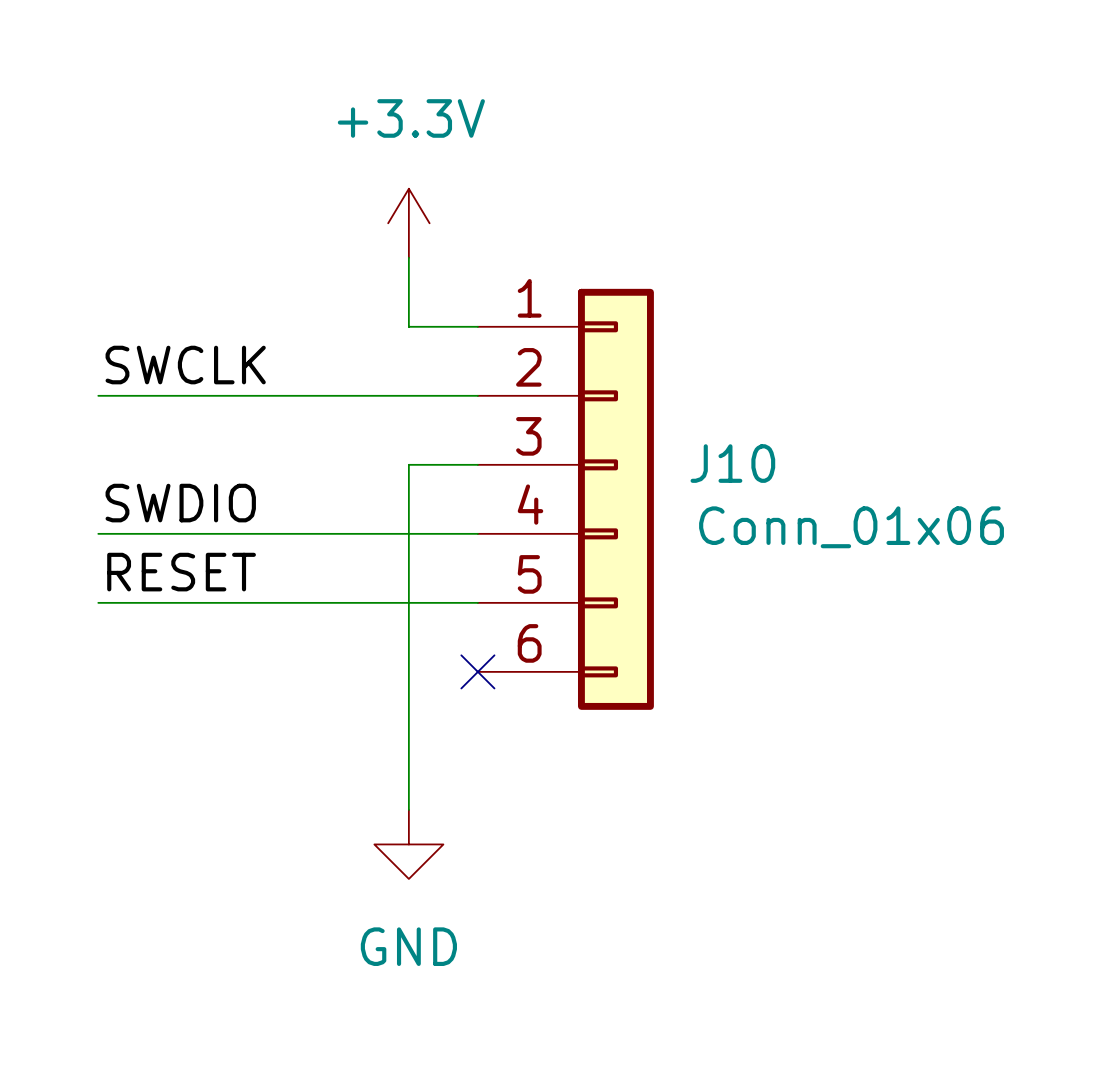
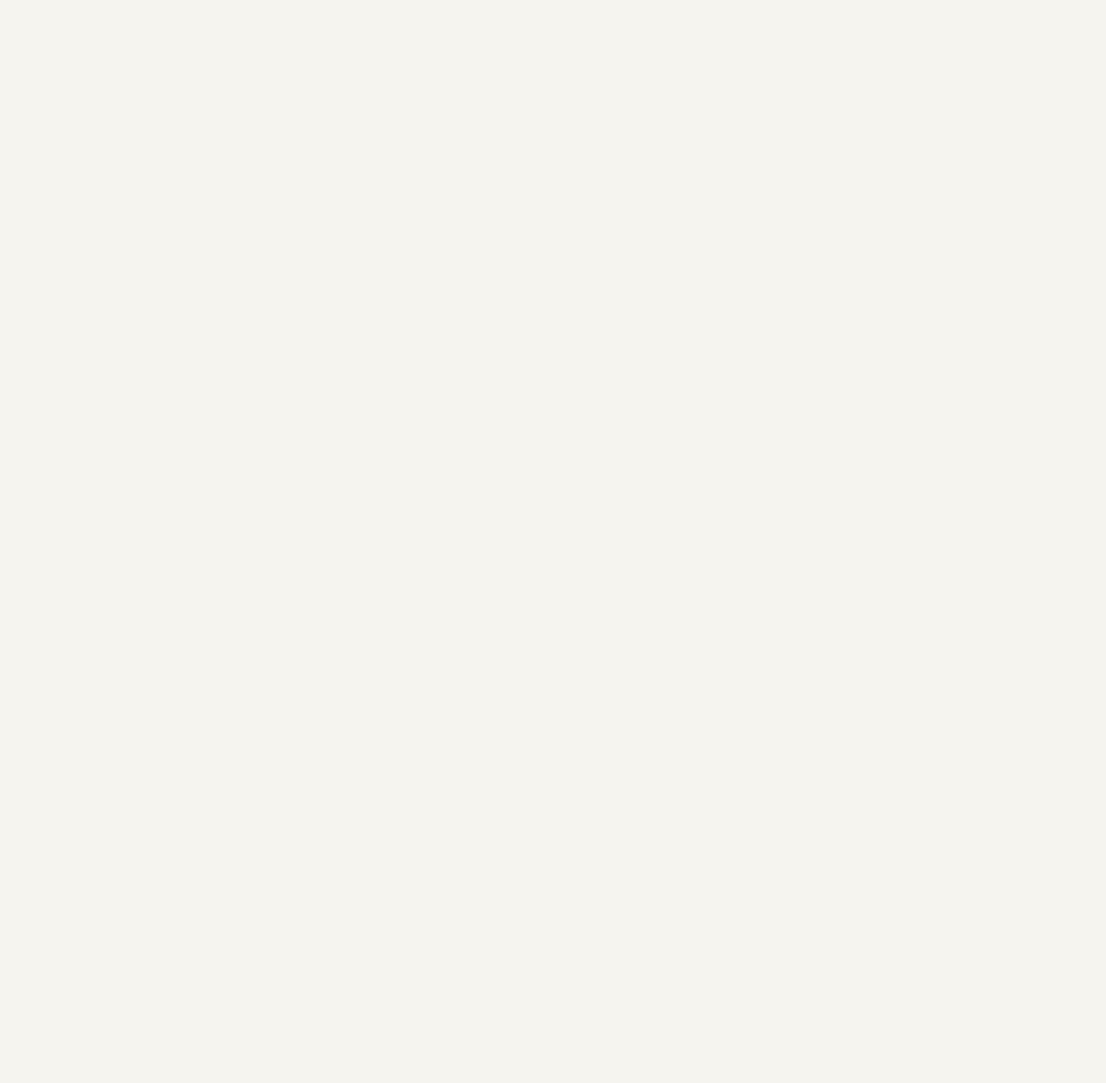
power symbol: +3.3V (408, 223) -> none
wire: (408, 257) (408, 326) (477, 326) -> none
label: SWCLK (185, 365) -> none
wire: (98, 395) (477, 395) -> none
wire: (477, 464) (408, 464) (408, 809) -> none
J10: Conn_01x06 (565, 499) -> none
label: SWDIO (180, 503) -> none
wire: (98, 533) (477, 533) -> none
label: RESET (181, 572) -> none
wire: (98, 602) (477, 602) -> none
no-connect mark: (477, 671) -> none
power symbol: GND (408, 844) -> none

